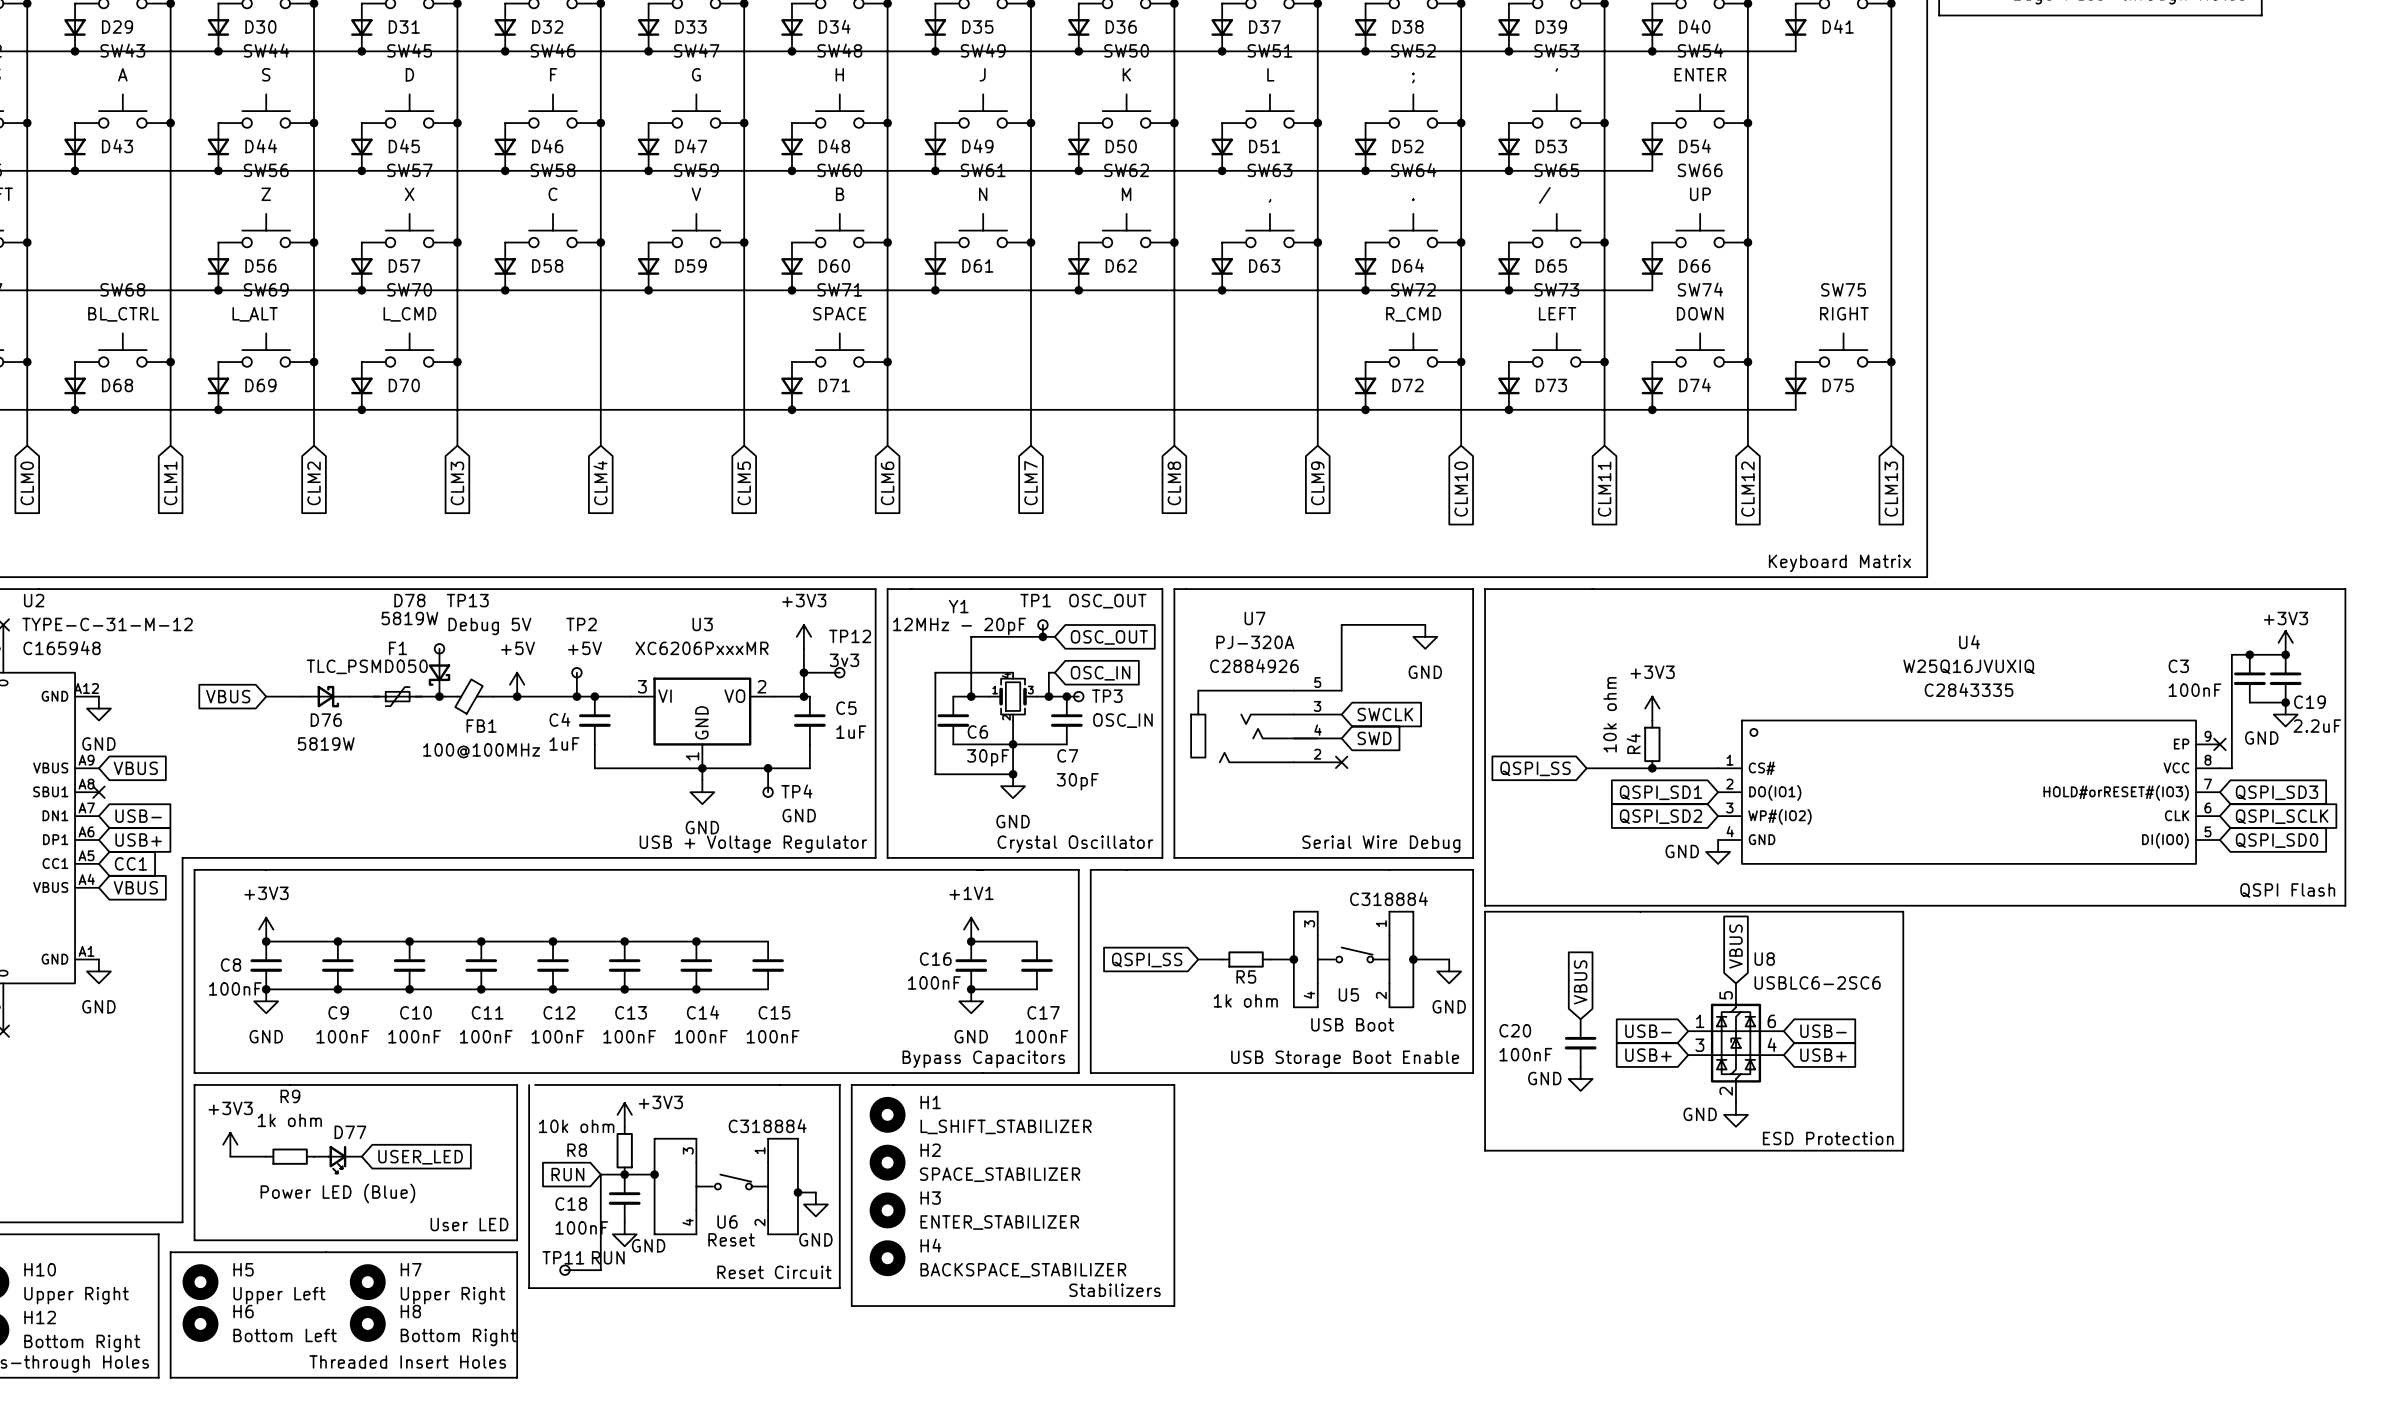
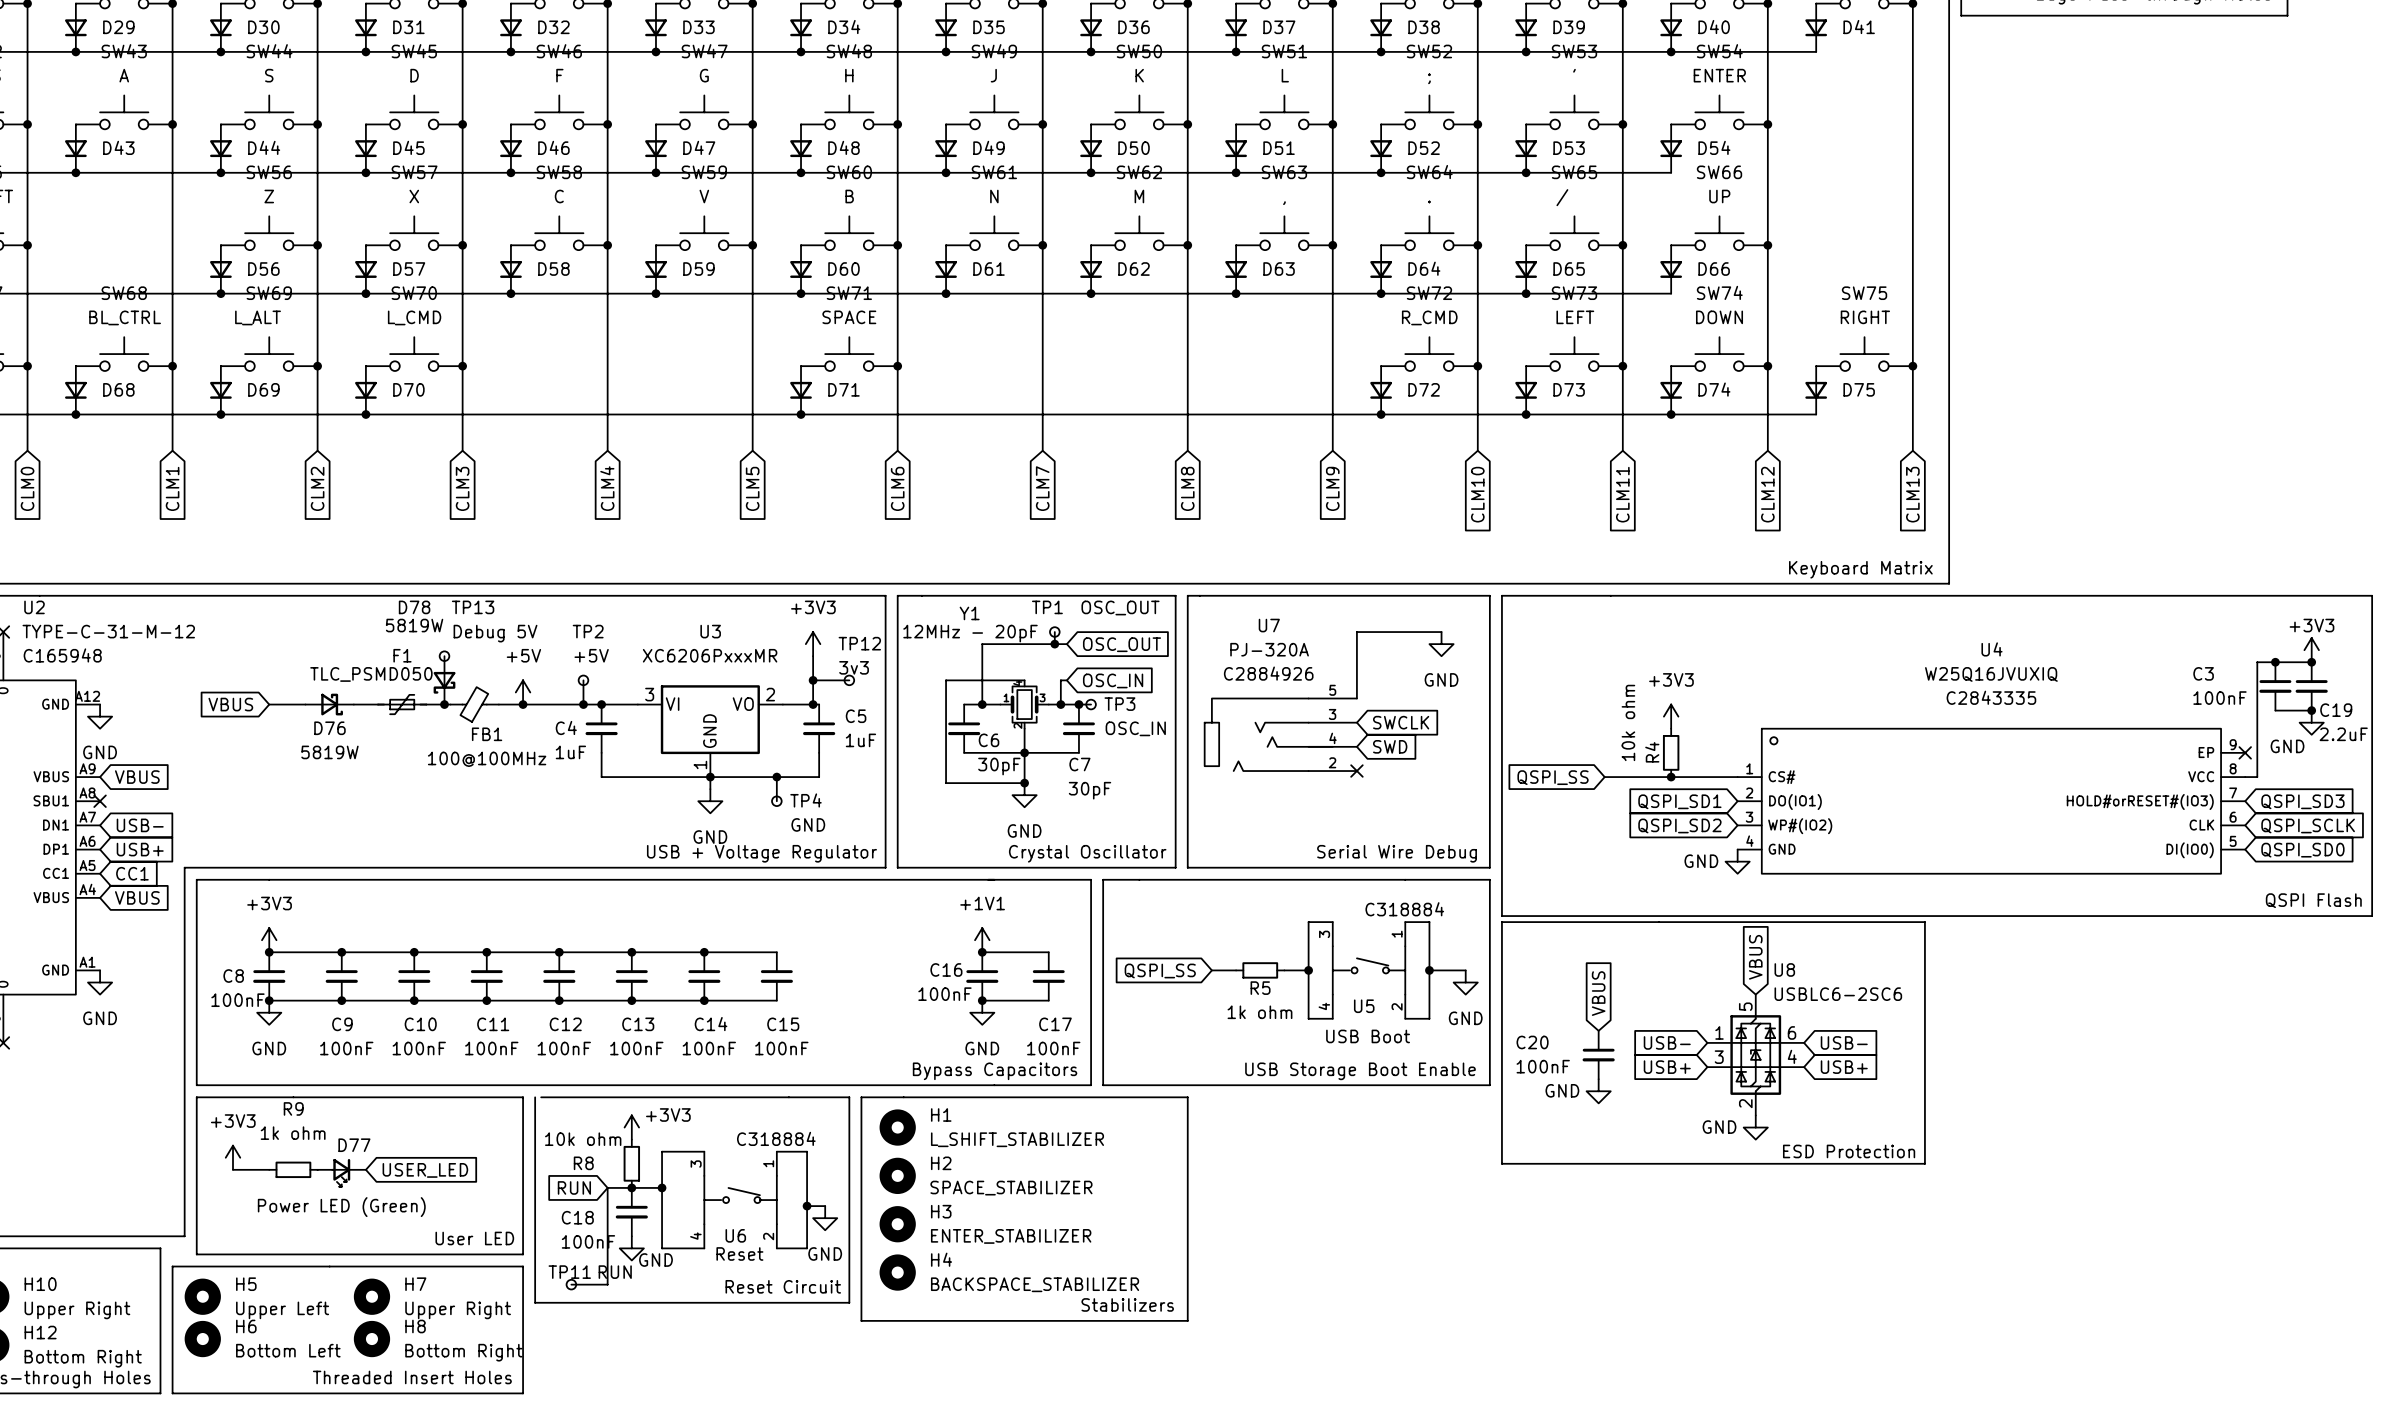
D77 value: Power LED (Blue) (337, 1193) -> Power LED (Green) (341, 1207)

